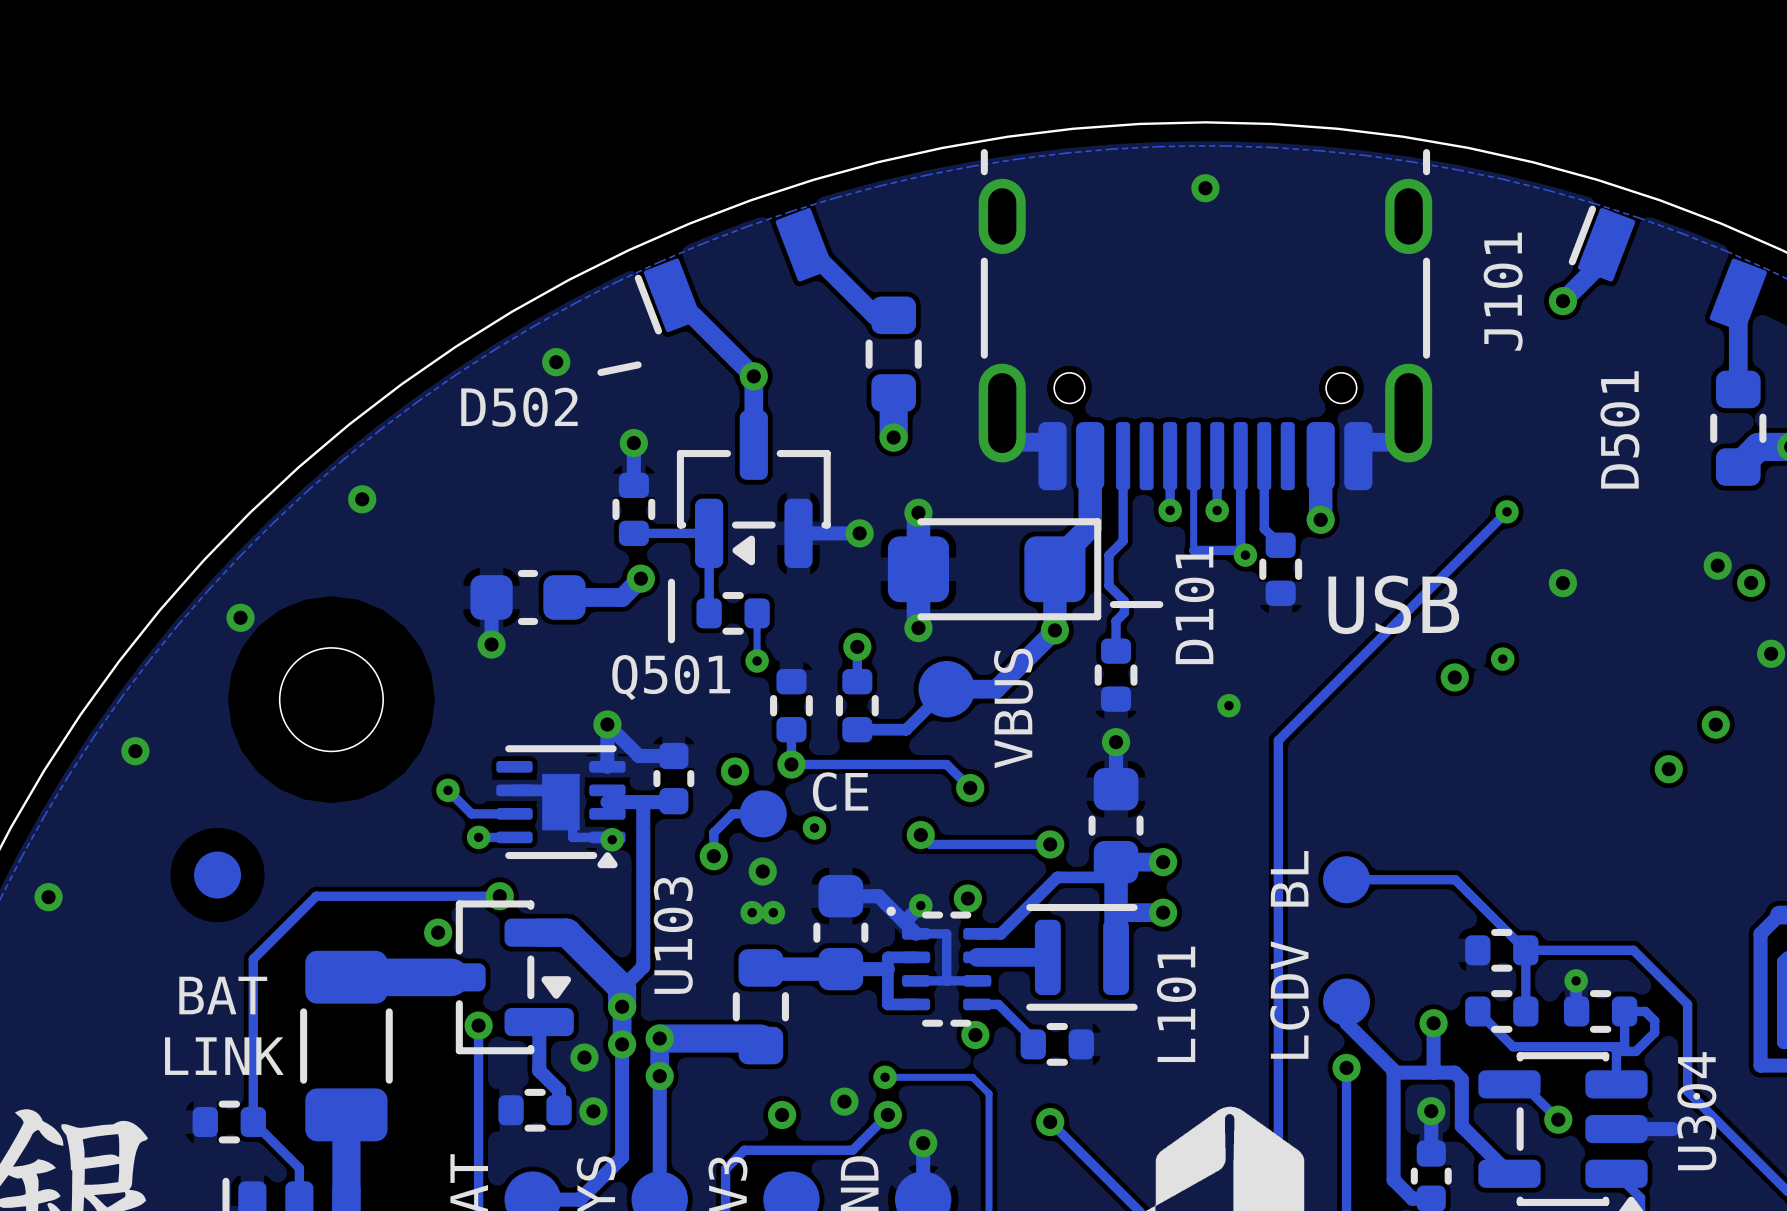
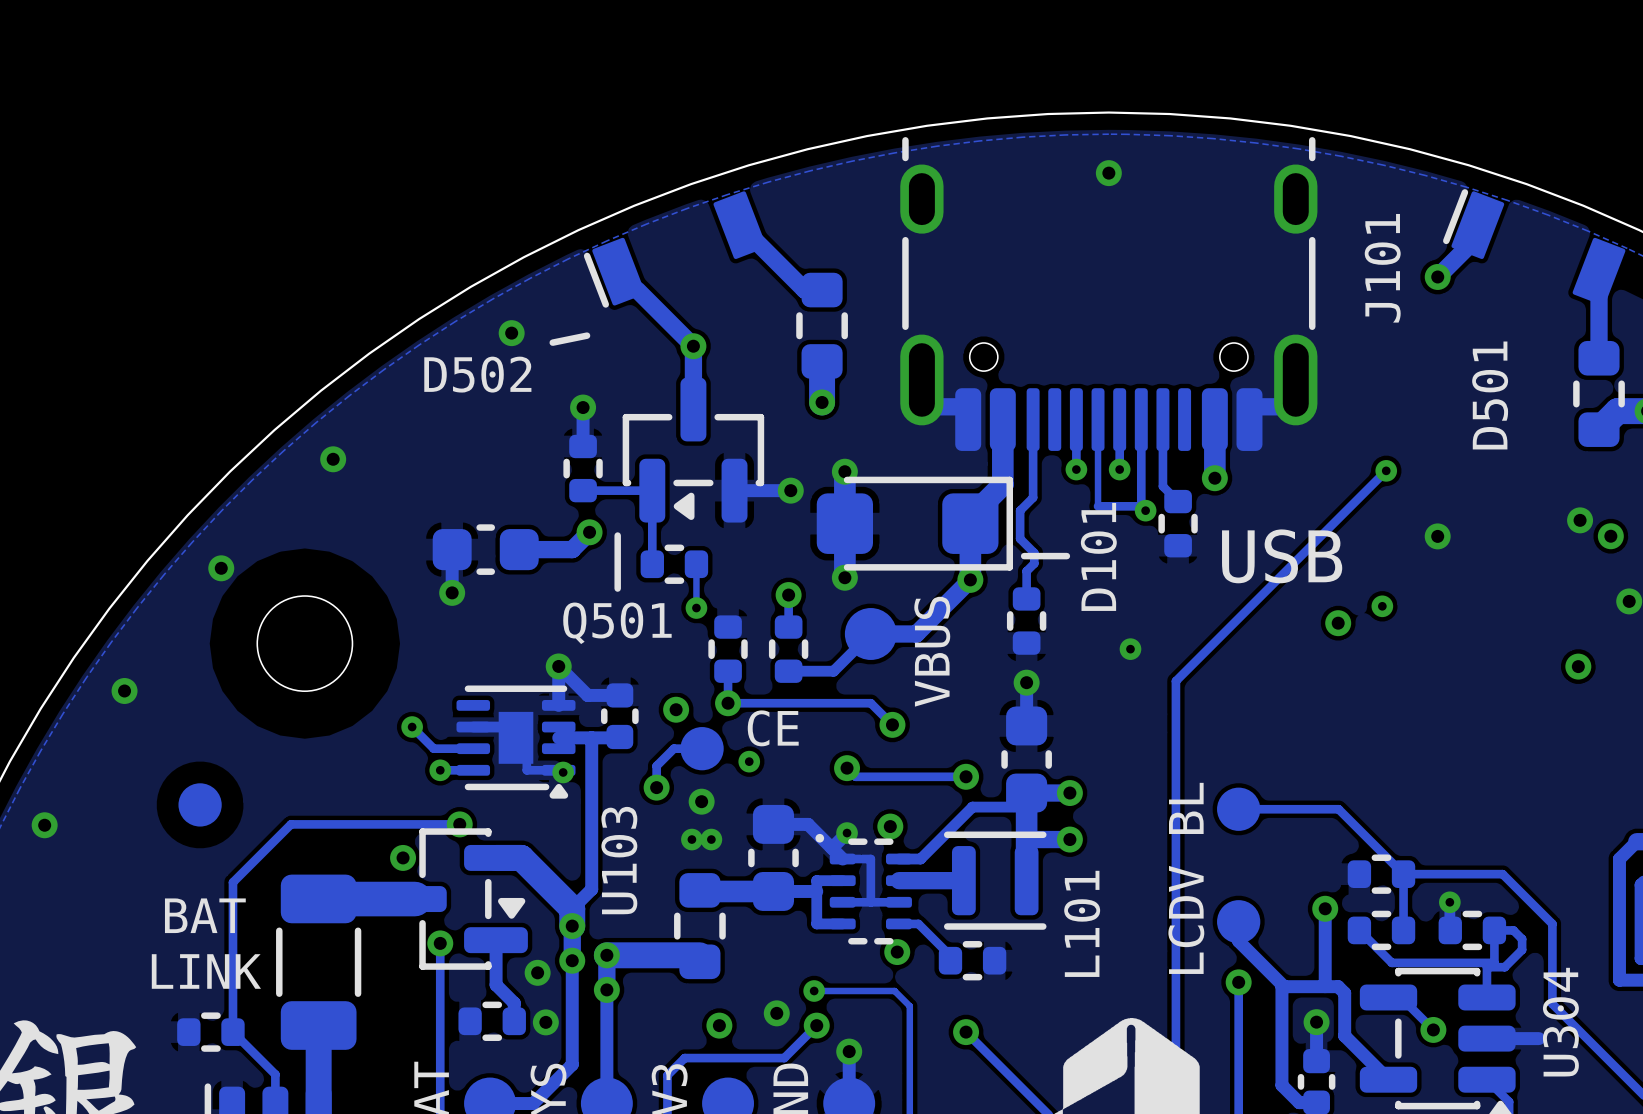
via: (1668, 769) -> none
track: none -> (1325, 908) (1325, 986)
track: (1433, 1023) (1433, 1072) -> none
via position: (1433, 1023) -> (1325, 908)

